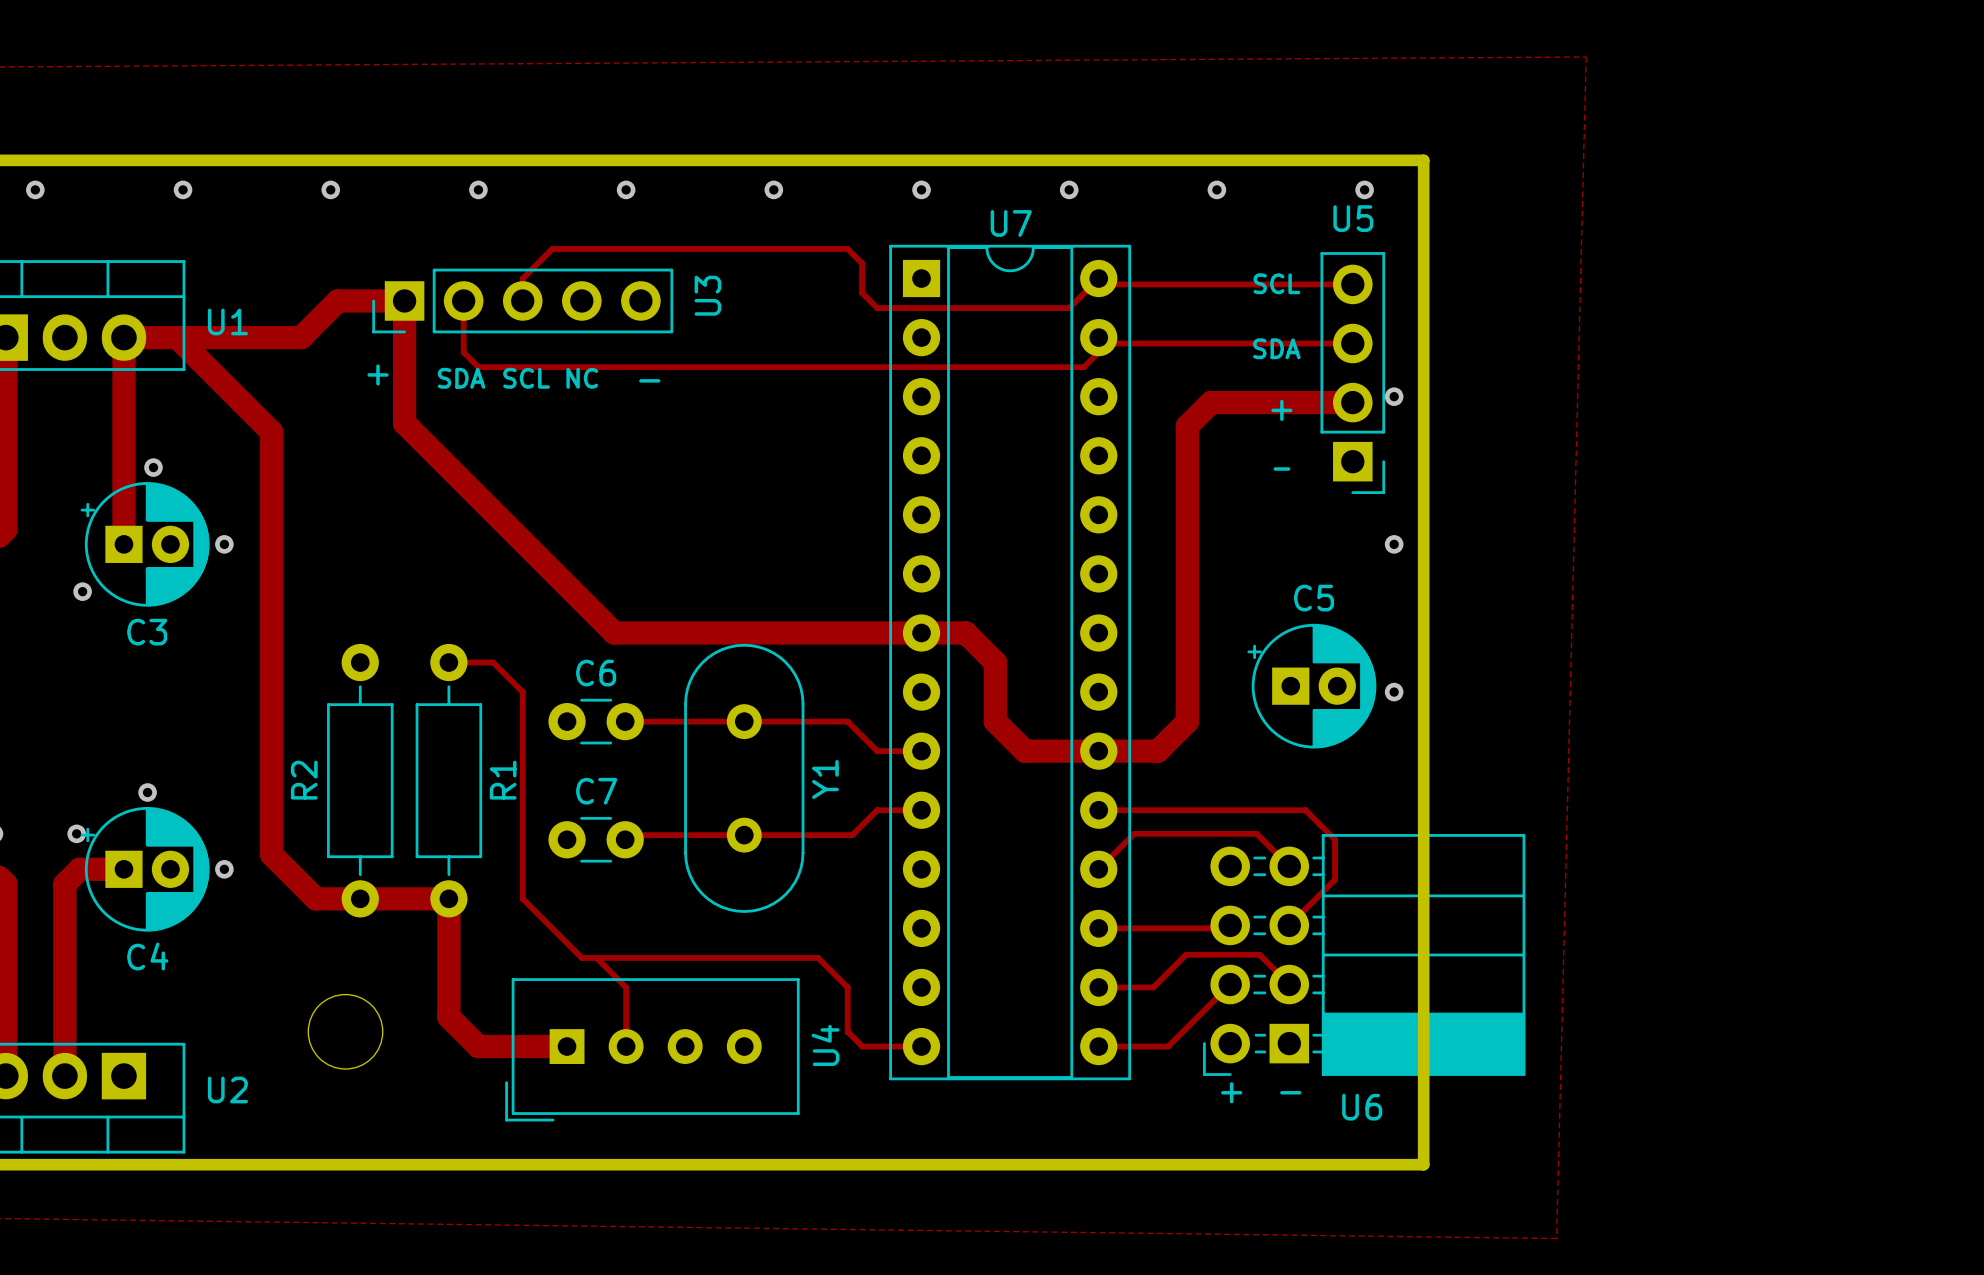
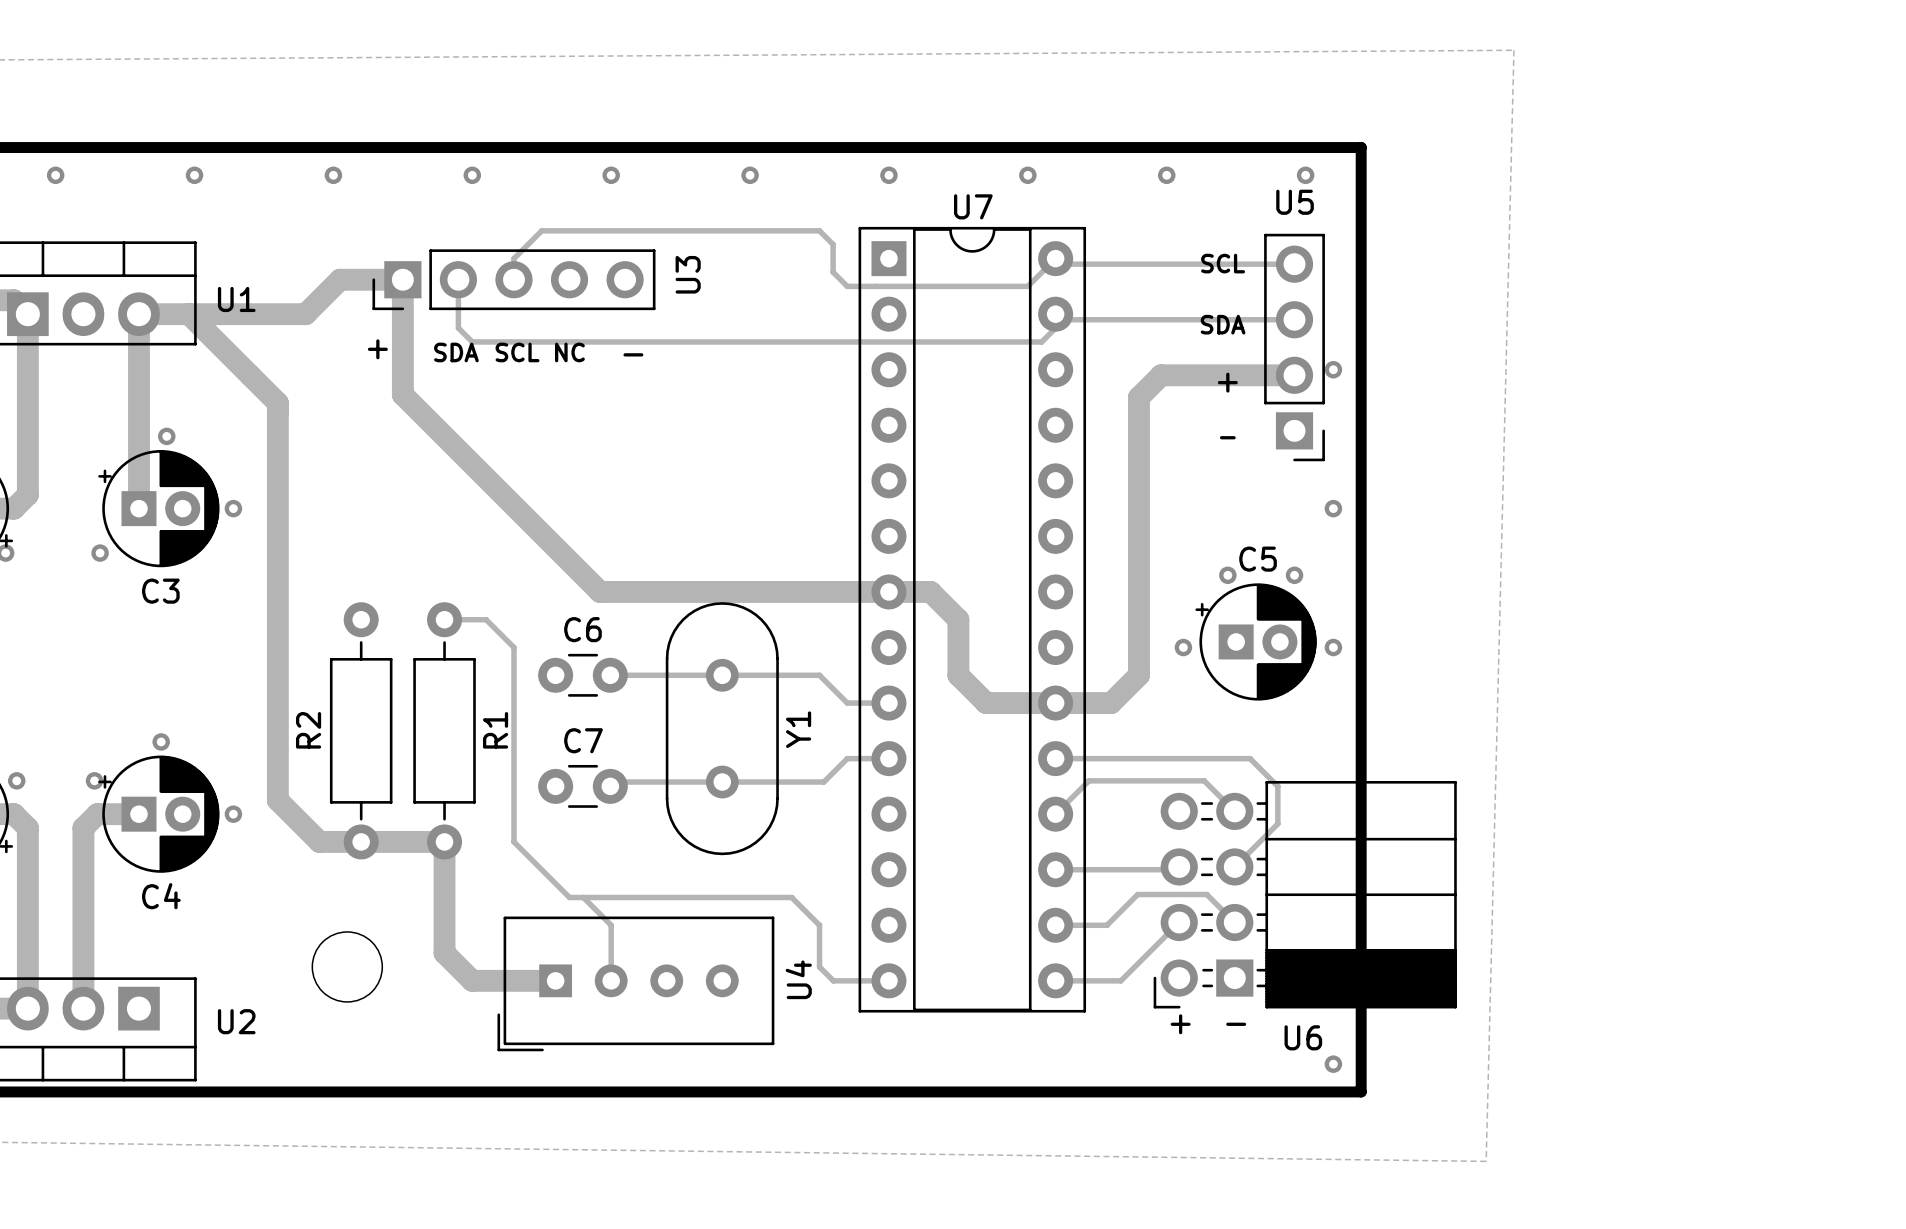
via: none -> (1227, 575)
via: none -> (1294, 575)
via: none -> (1183, 647)
via: none -> (1333, 1064)

